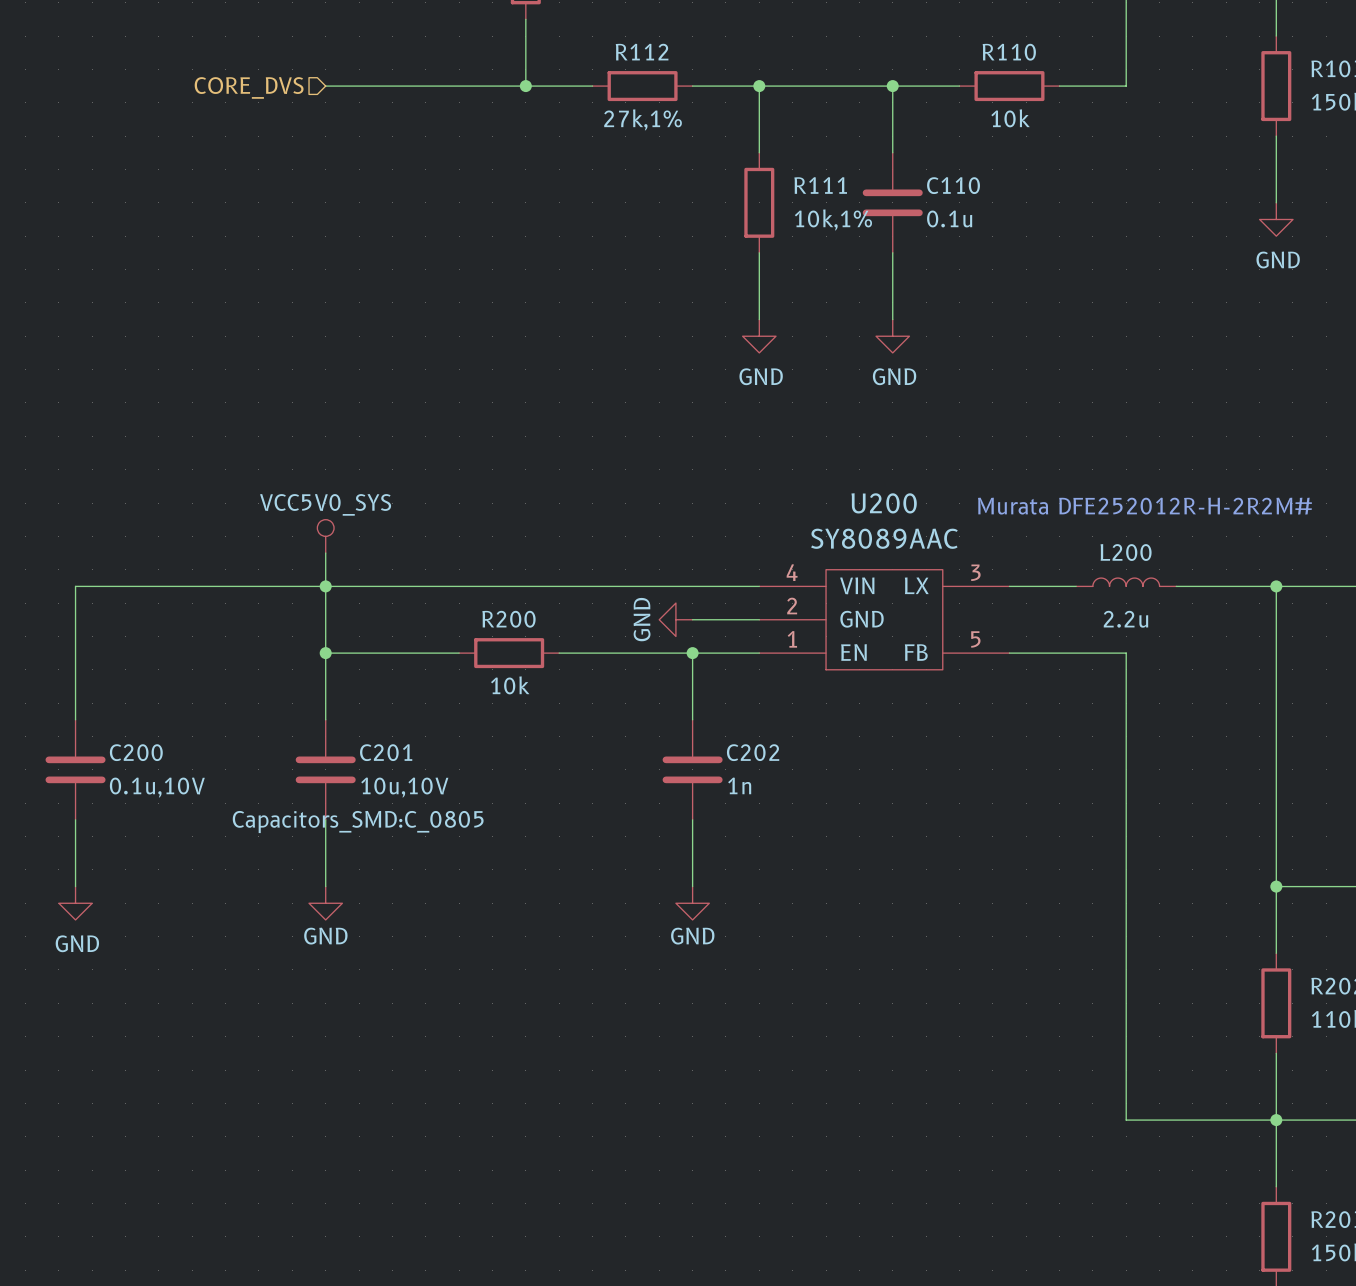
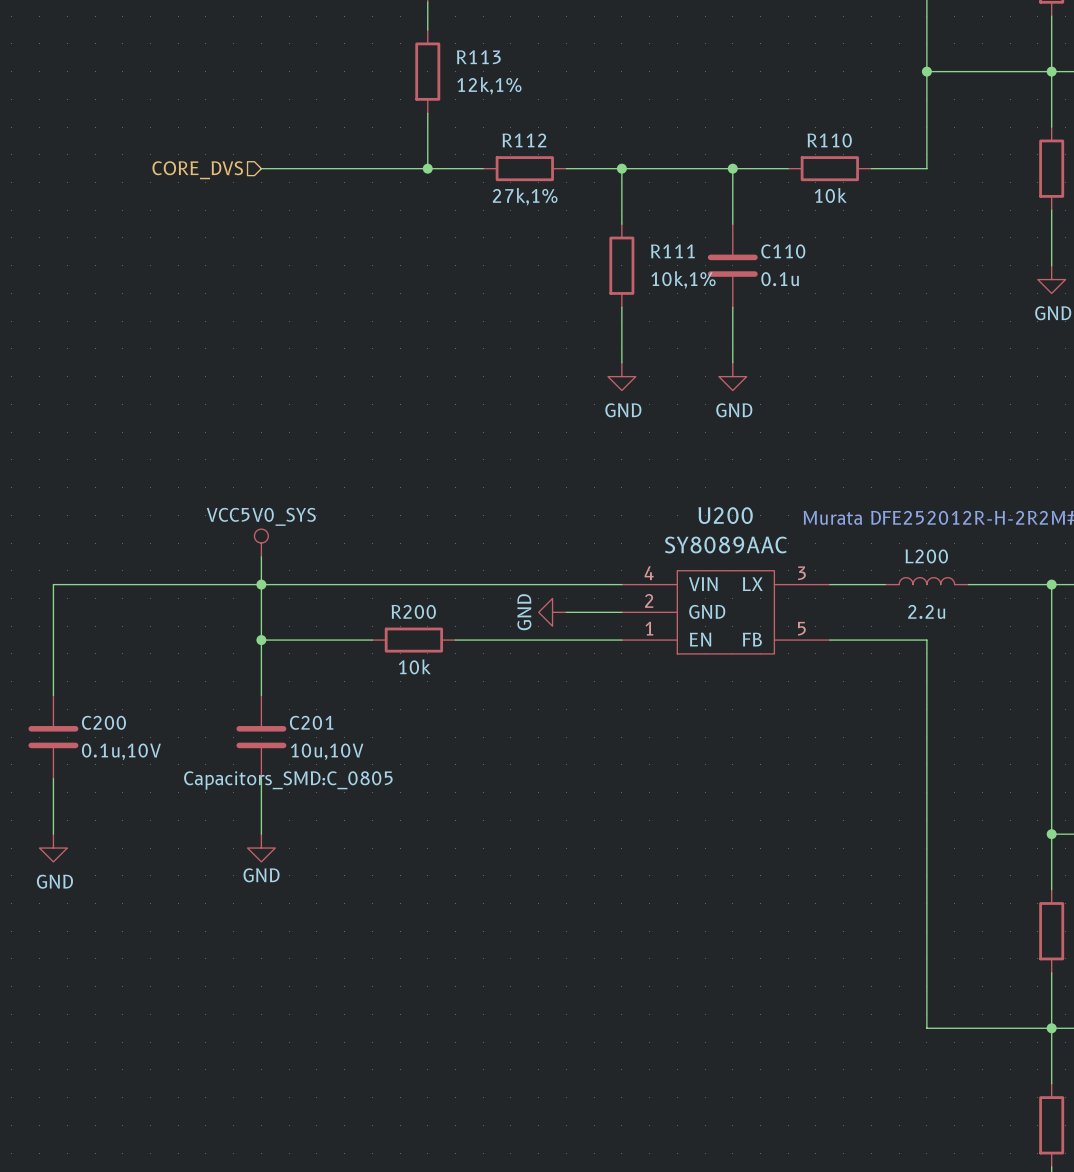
wire: (692, 653) (692, 719) -> none
junction: (692, 653) -> none
C202: 1n (692, 769) -> none
wire: (692, 819) (692, 886) -> none
power symbol: GND (692, 903) -> none

